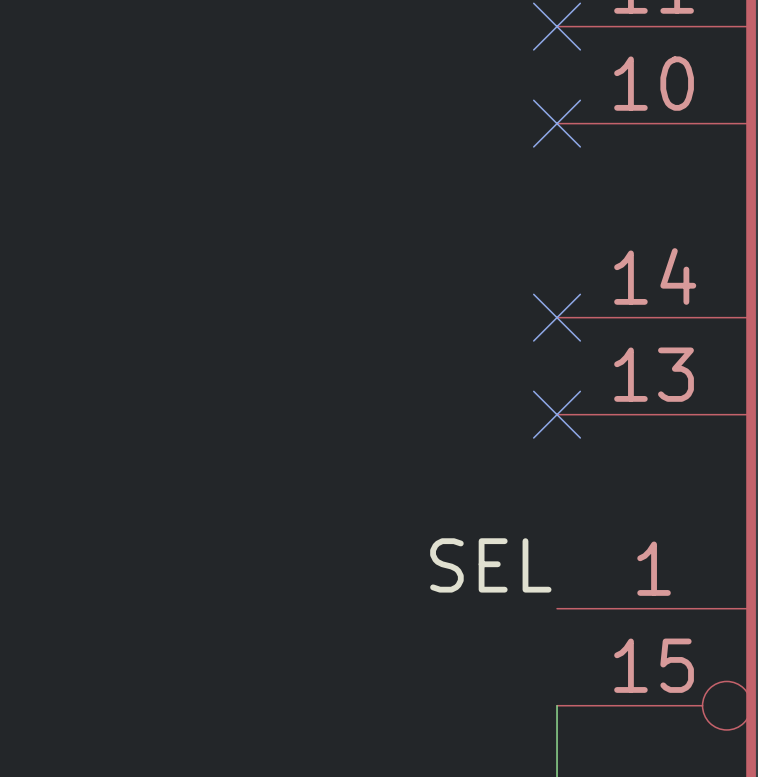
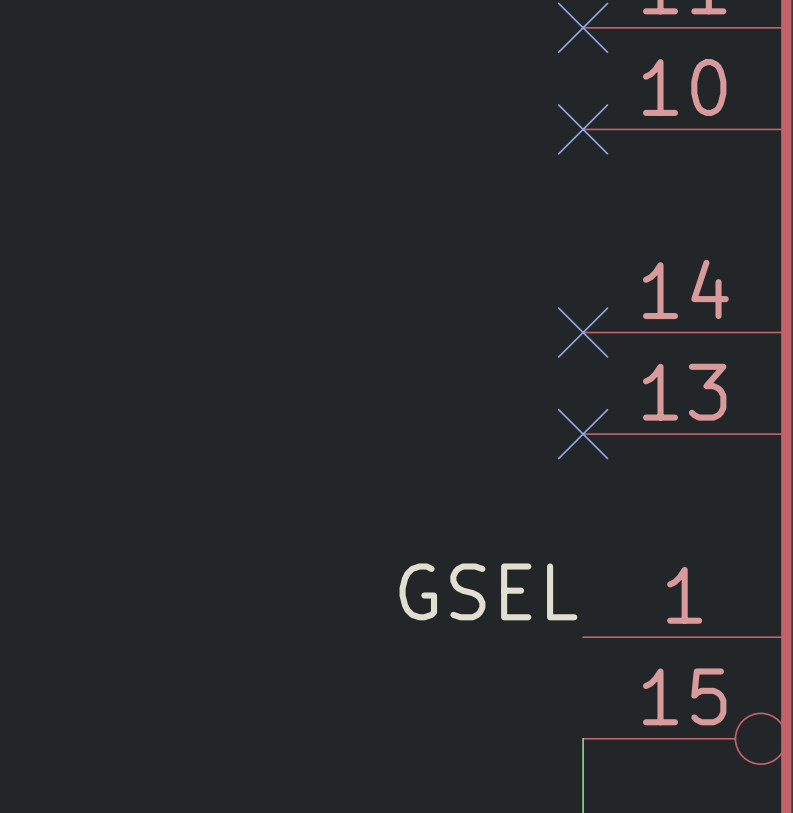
label: SEL (490, 565) -> GSEL (488, 591)

